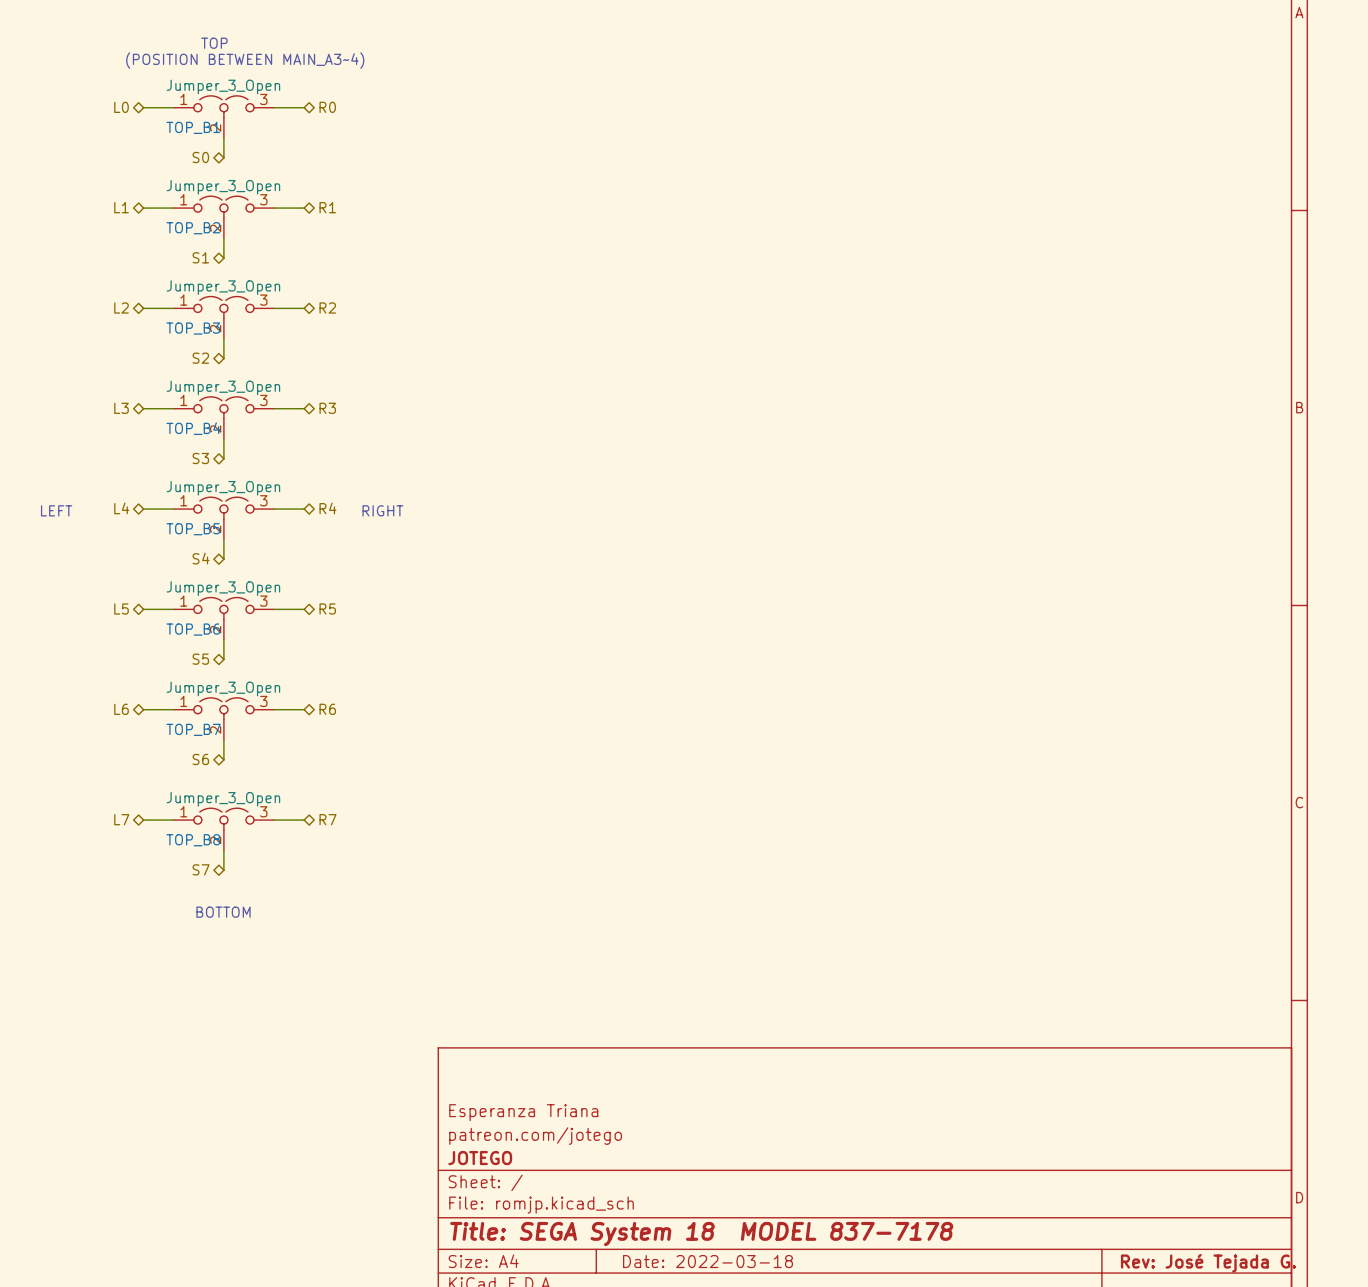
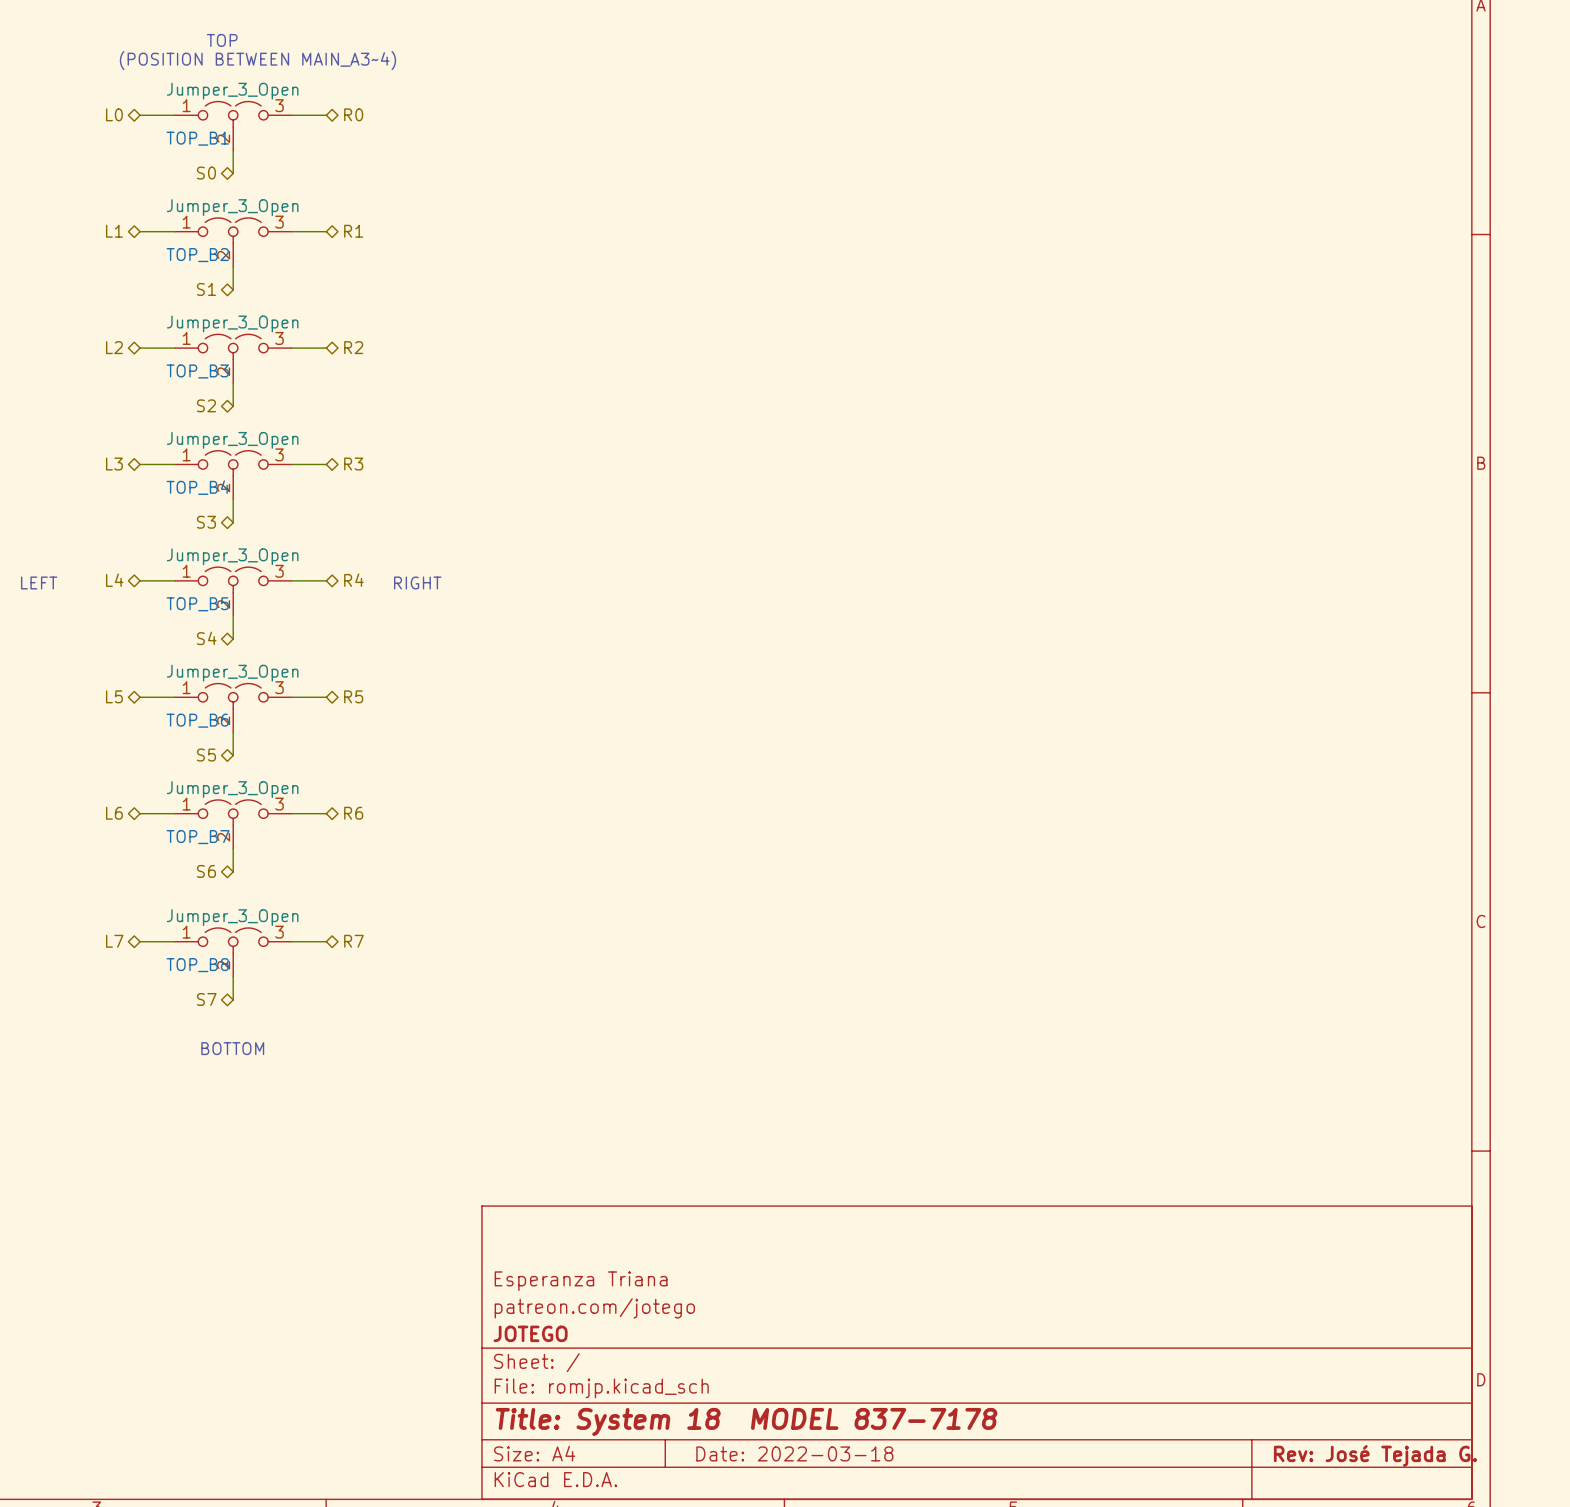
title block: Title: SEGA System 18 MODEL 837-7178 (701, 1234) -> Title: System 18 MODEL 837-7178 (746, 1421)

